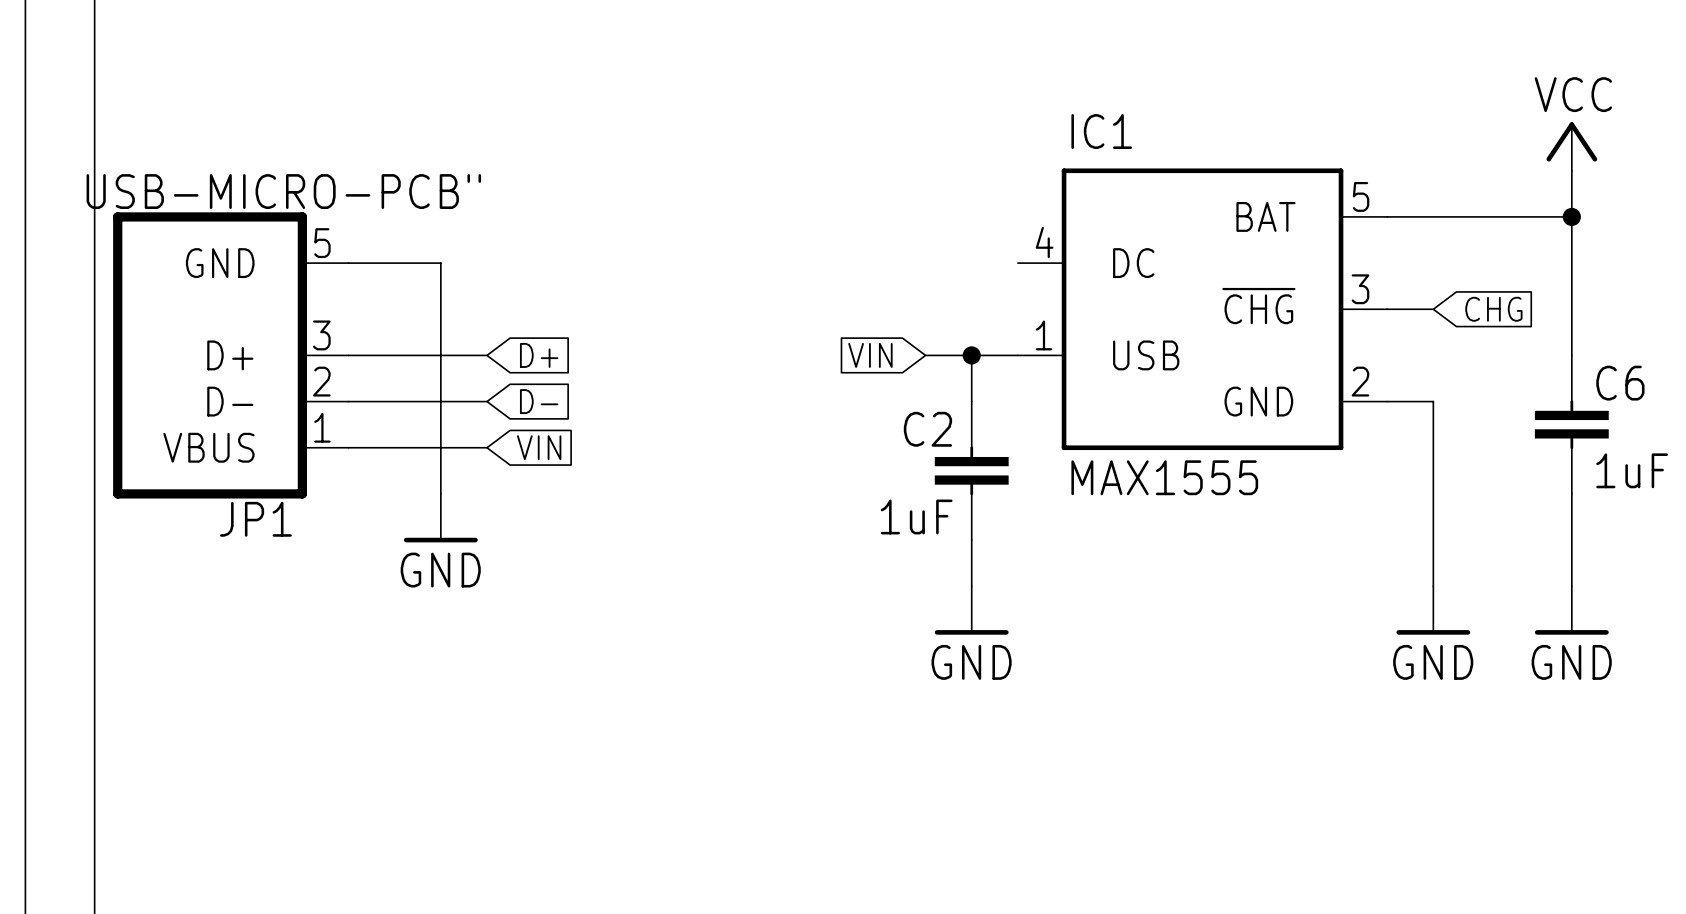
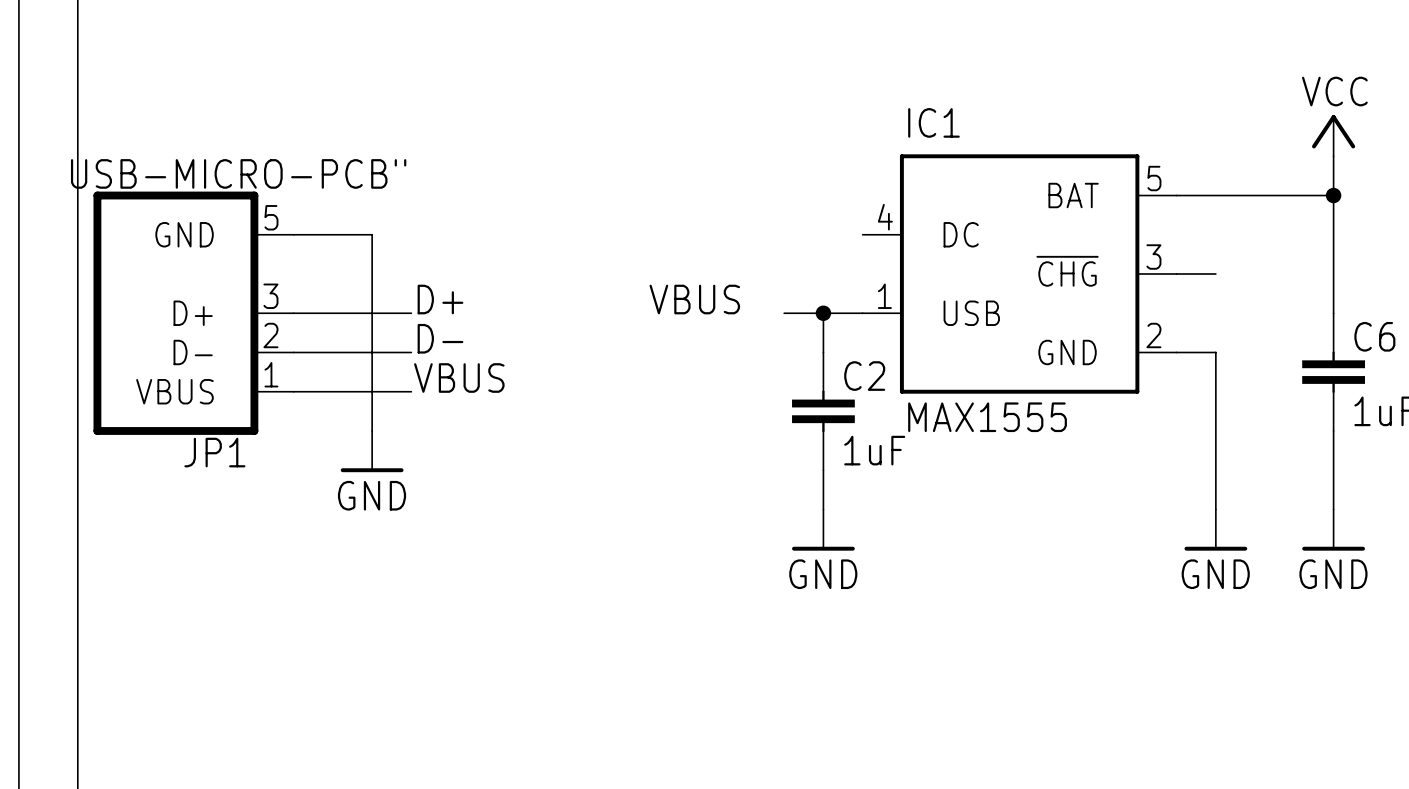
global label: CHG (1493, 309) -> none
label: none -> D+ (440, 299)
label: none -> VBUS (694, 299)
global label: D+ (539, 355) -> none
global label: VIN (870, 355) -> none
label: none -> D- (440, 338)
global label: D- (539, 401) -> none
C2 name position: C2 (927, 429) -> C2 (864, 376)
label: none -> VBUS (459, 378)
global label: VIN (539, 447) -> none
C2 value position: 1uF (916, 516) -> 1uF (874, 450)

